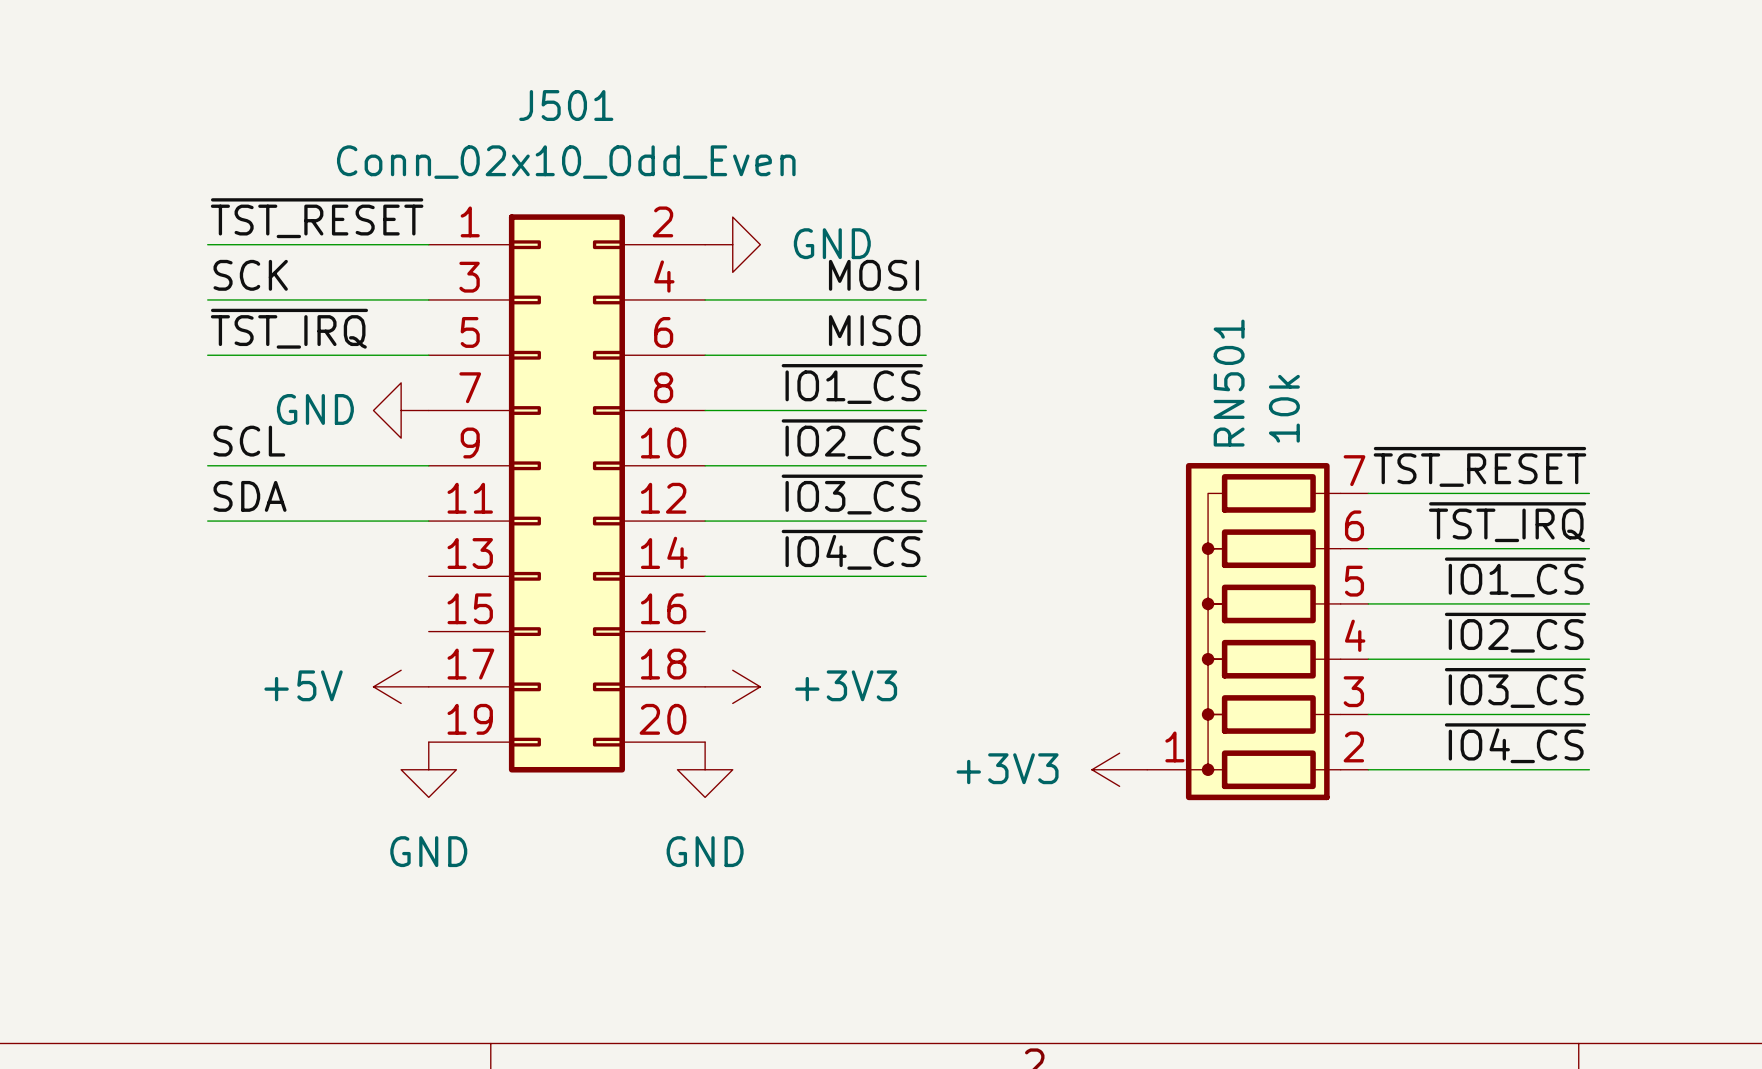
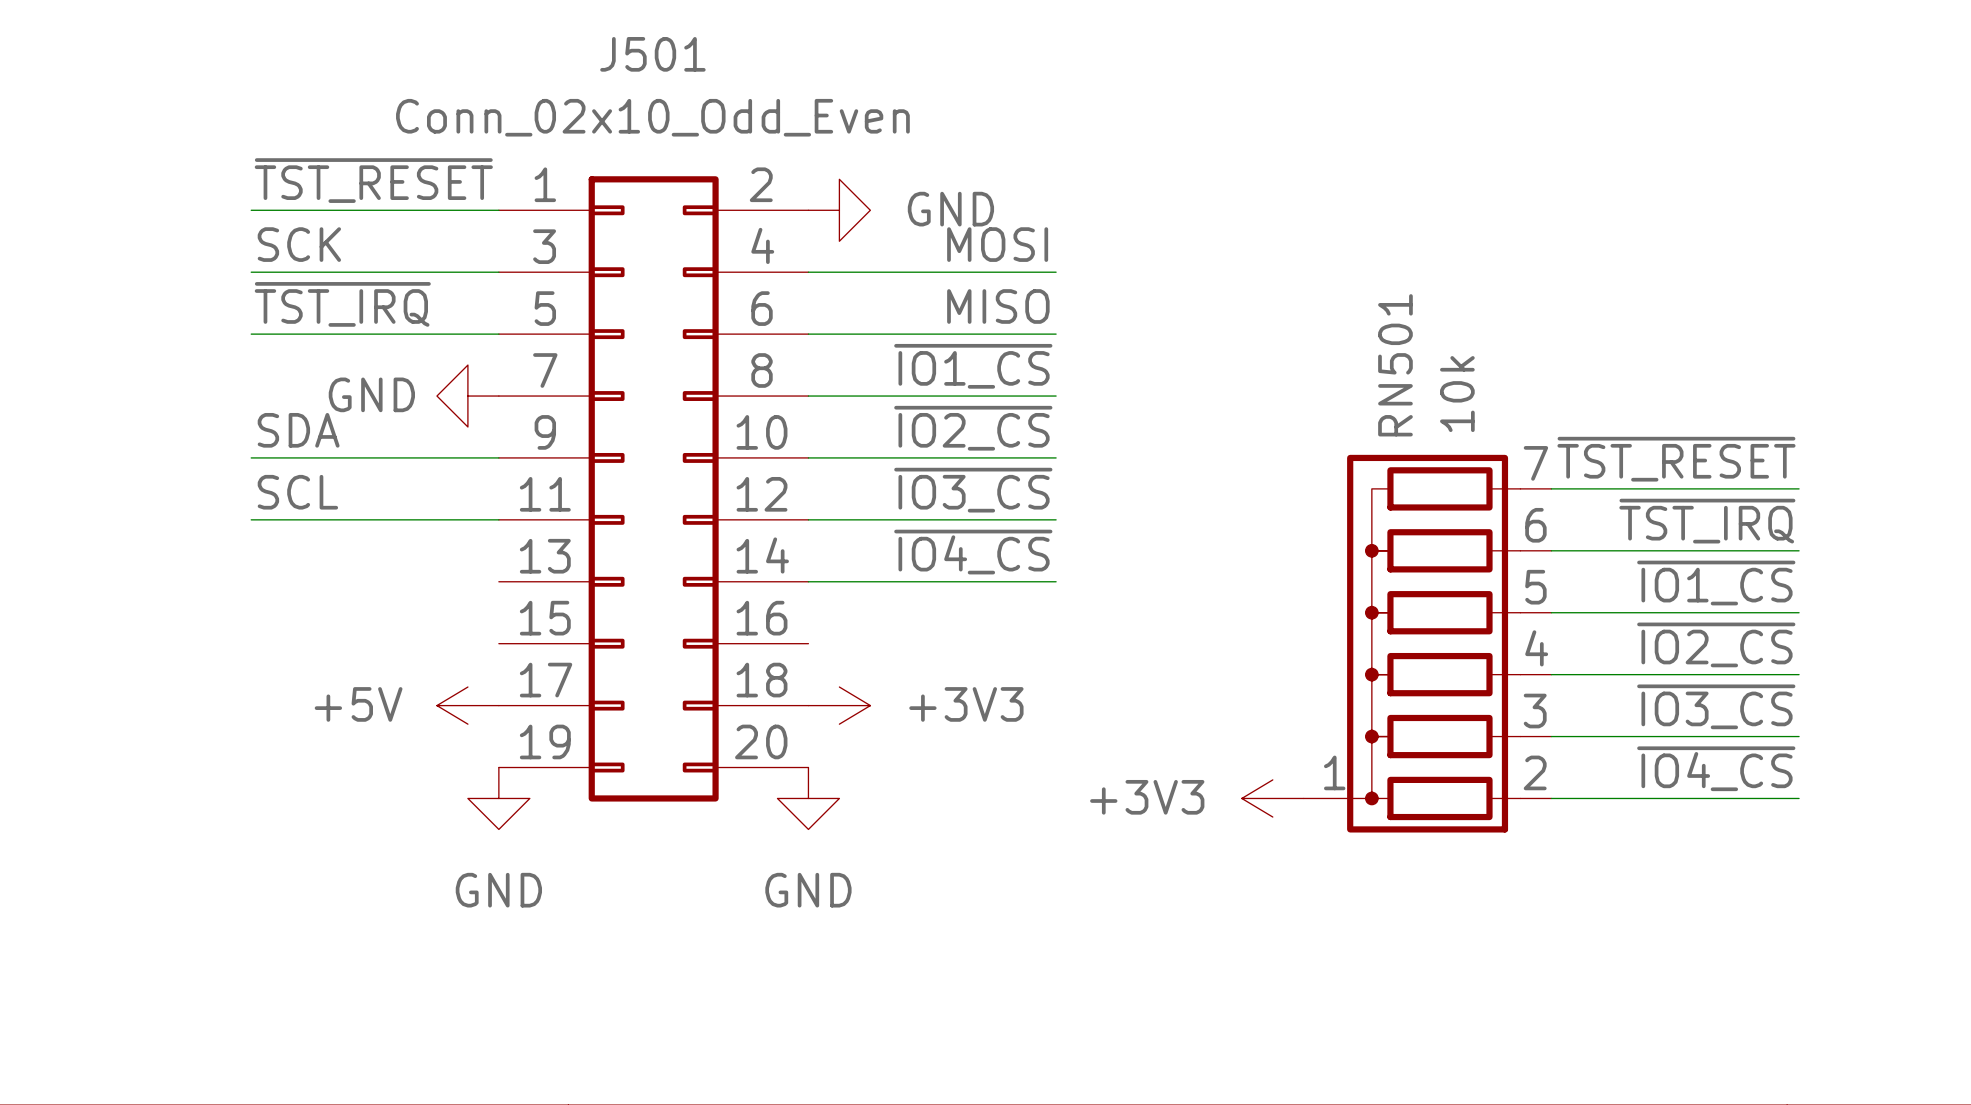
label: SCL (249, 441) -> SDA (298, 430)
label: SDA (250, 496) -> SCL (297, 492)

